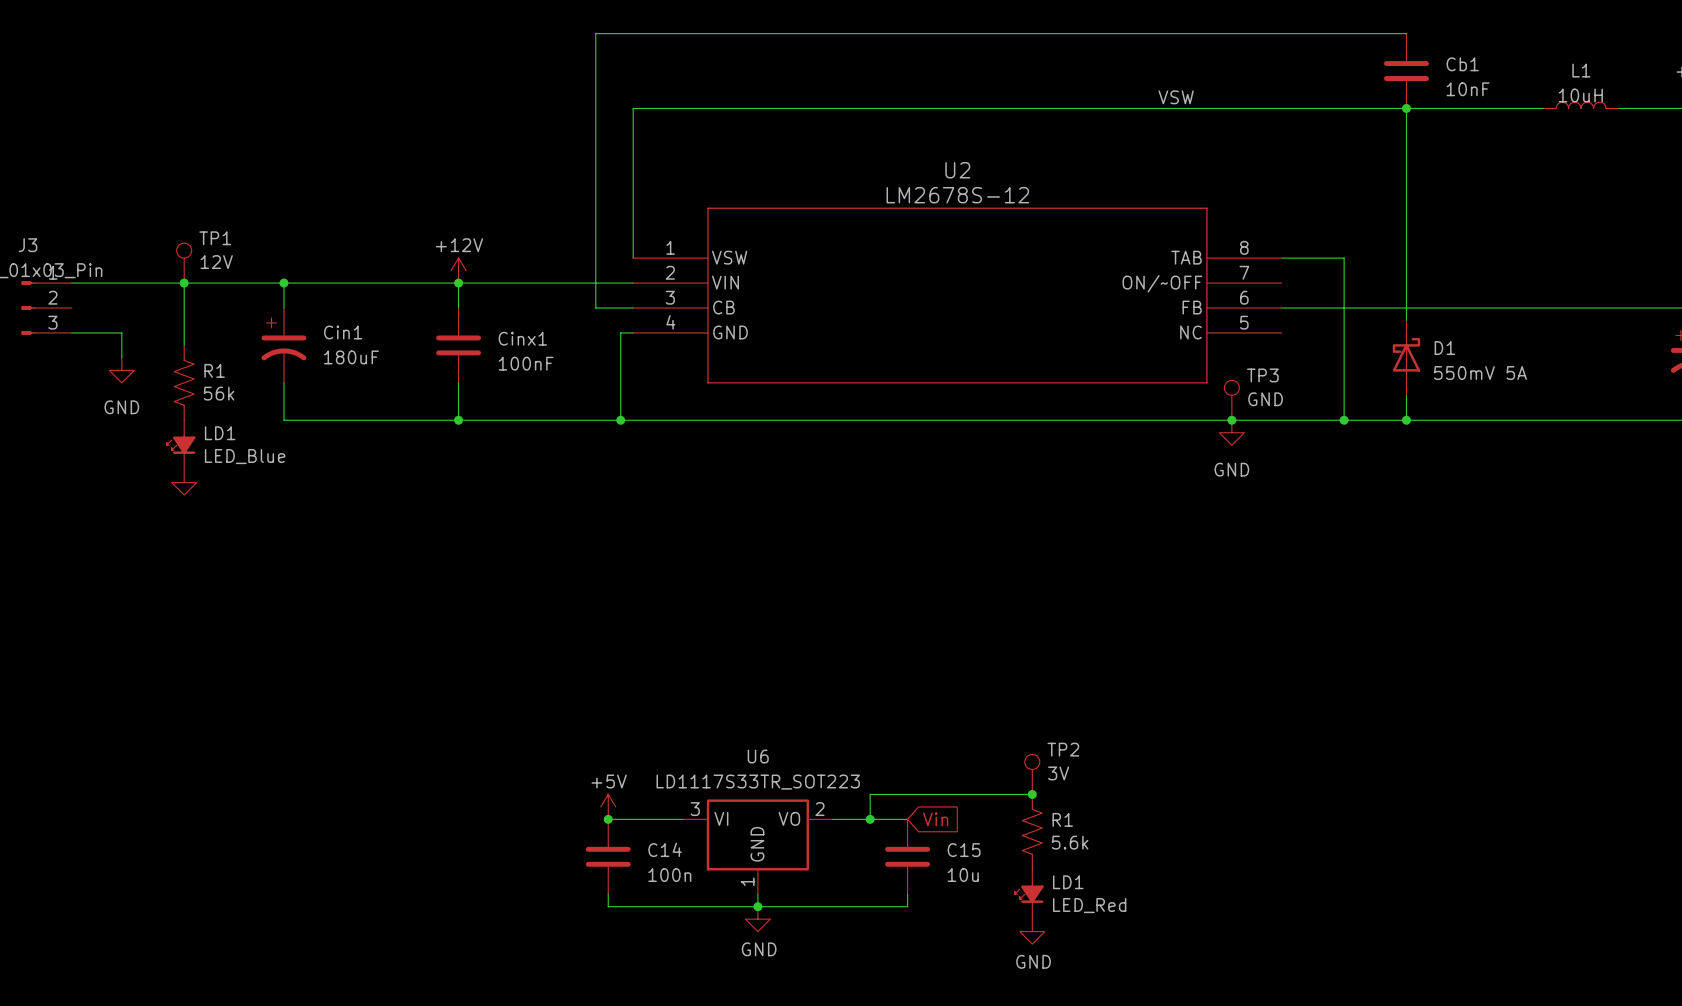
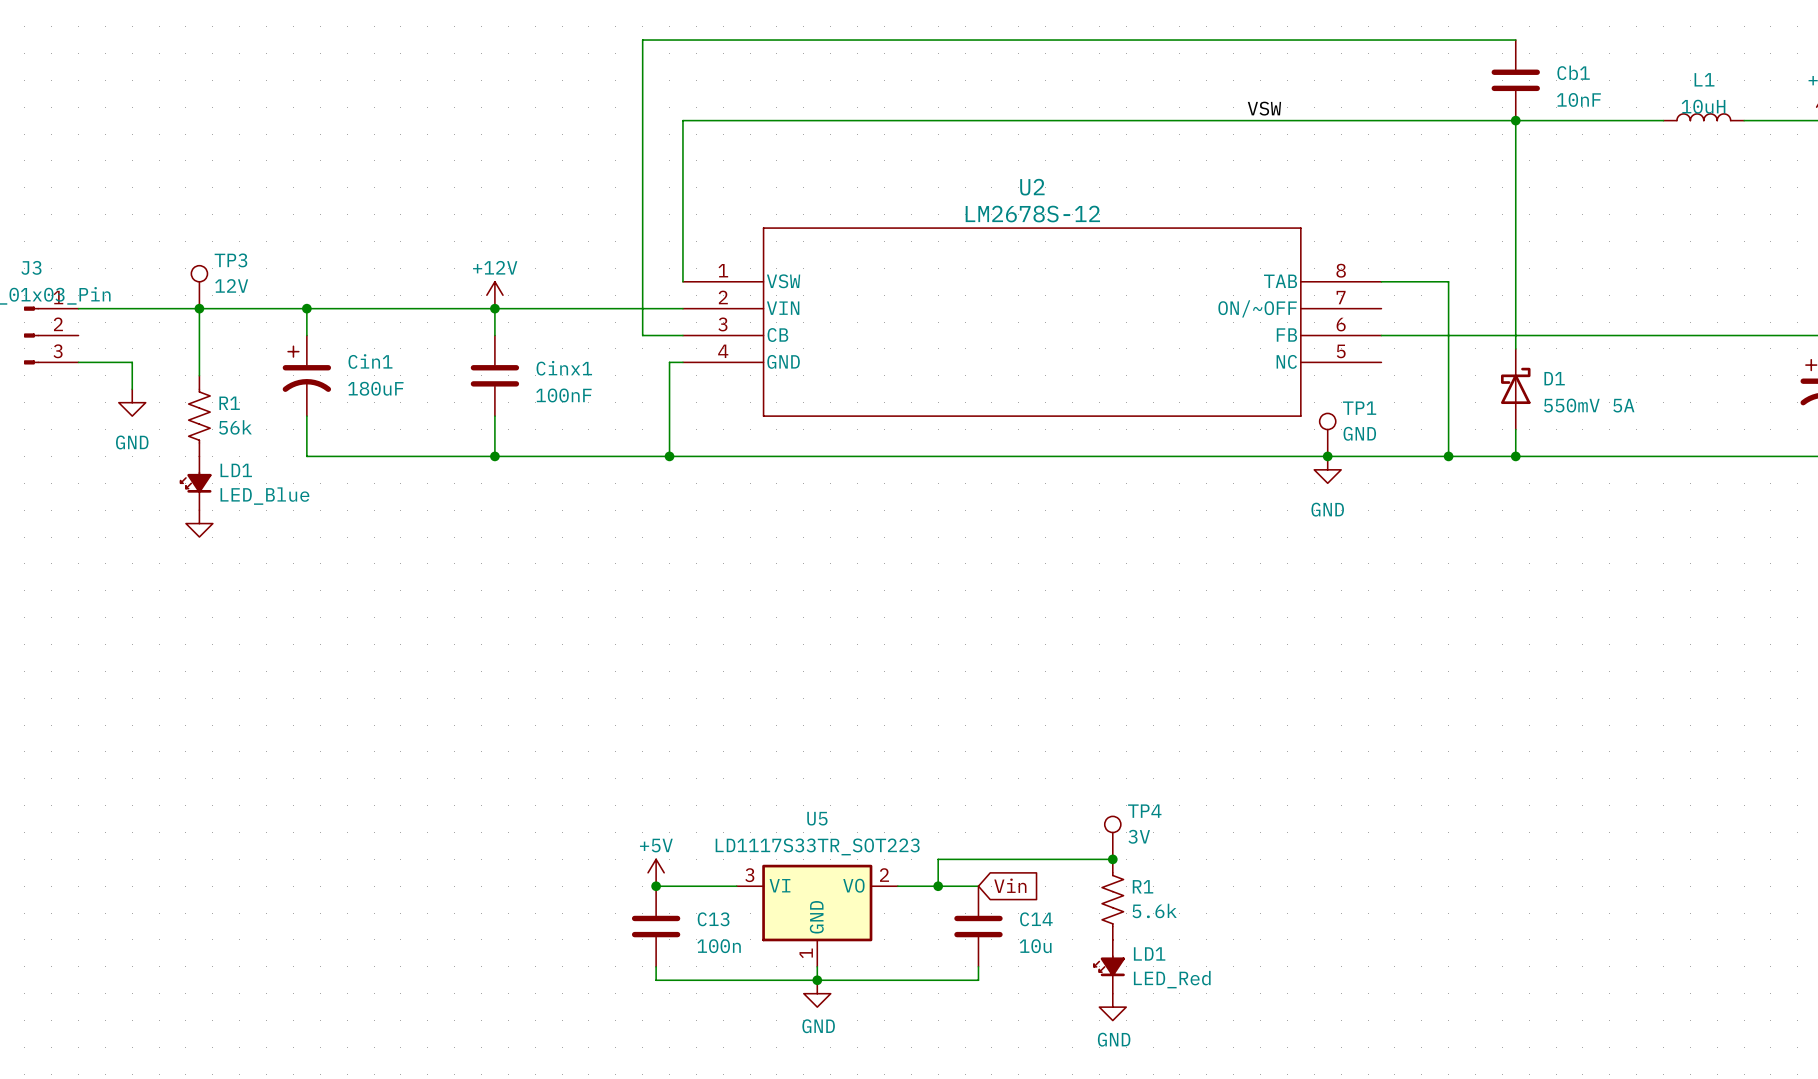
TP1 name: TP1 (215, 238) -> TP3 (230, 260)
TP3 name: TP3 (1262, 375) -> TP1 (1359, 408)
TP2 name: TP2 (1063, 749) -> TP4 (1144, 811)
U6 name: U6 (758, 756) -> U5 (817, 818)
C14 name: C14 (665, 849) -> C13 (713, 919)
C15 name: C15 (964, 850) -> C14 (1036, 919)

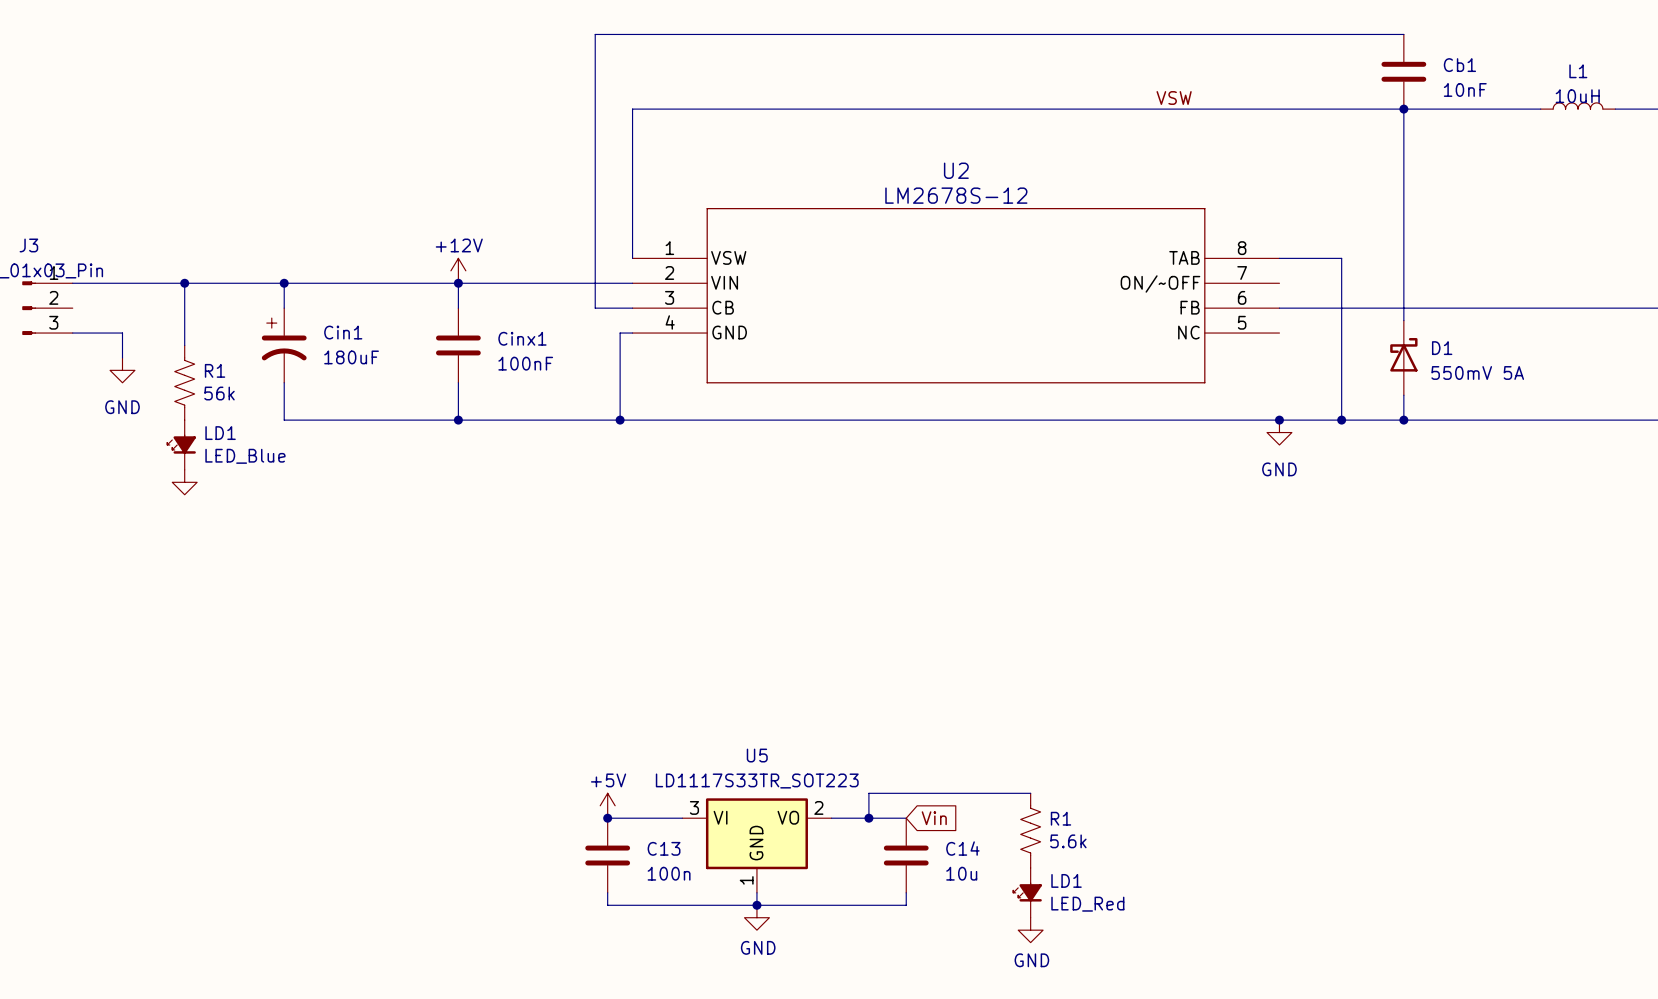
TP3: 12V (199, 287) -> none
TP1: GND (1327, 434) -> none
junction position: (1327, 456) -> (1279, 420)
power symbol position: GND (1327, 469) -> GND (1279, 432)
TP4: 3V (1112, 837) -> none
junction: (1112, 859) -> none

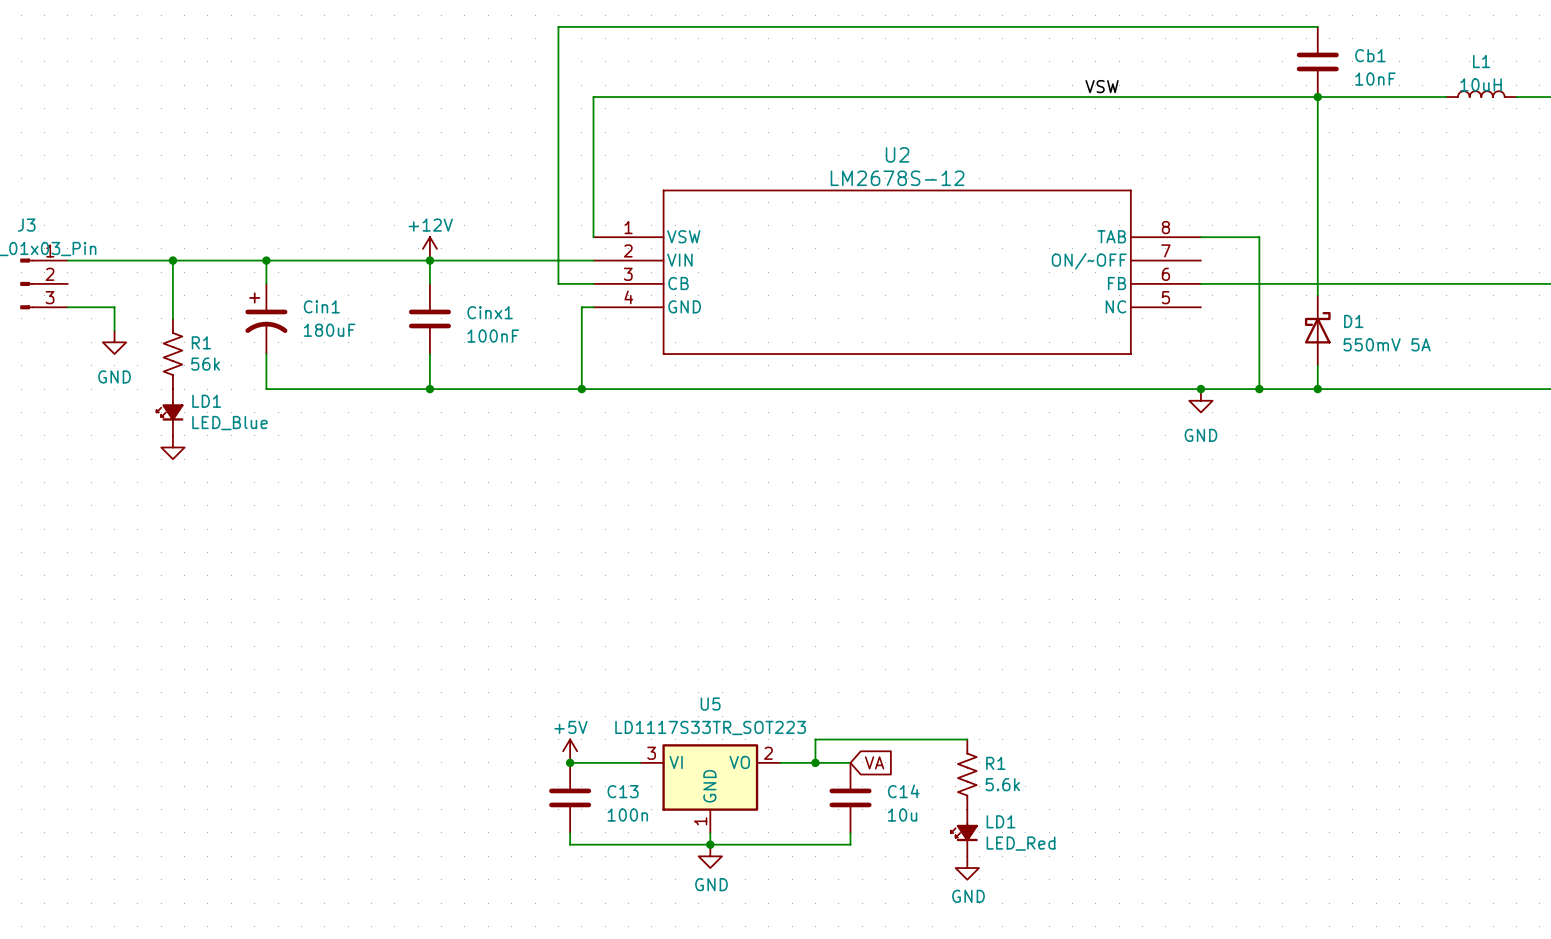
global label: Vin (934, 818) -> VA (874, 762)

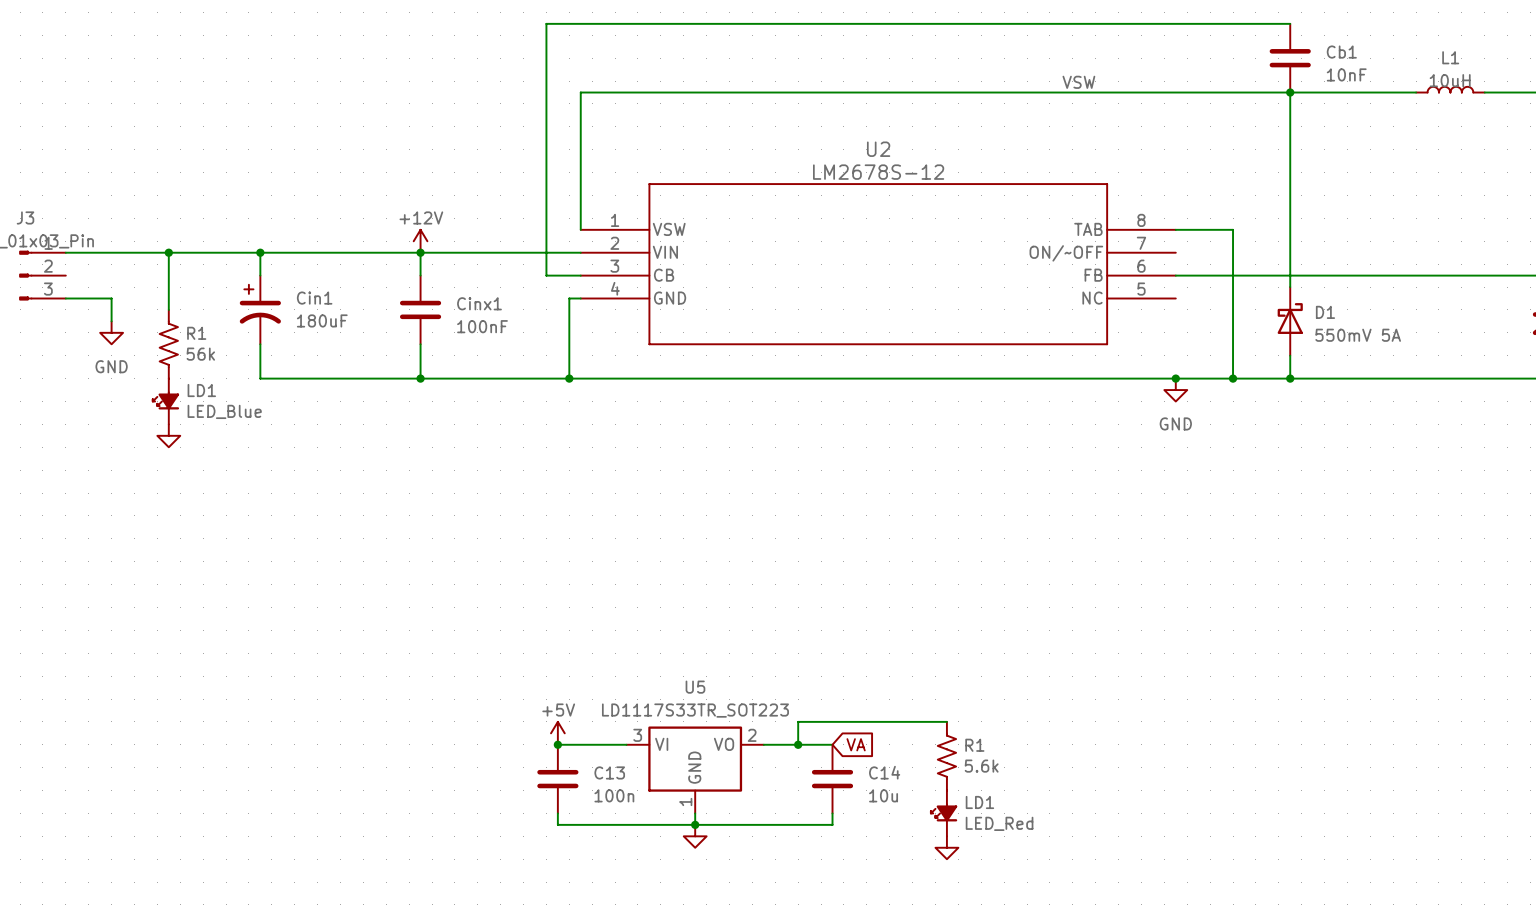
power symbol text: GND (711, 884) -> none
power symbol text: GND (968, 896) -> none

